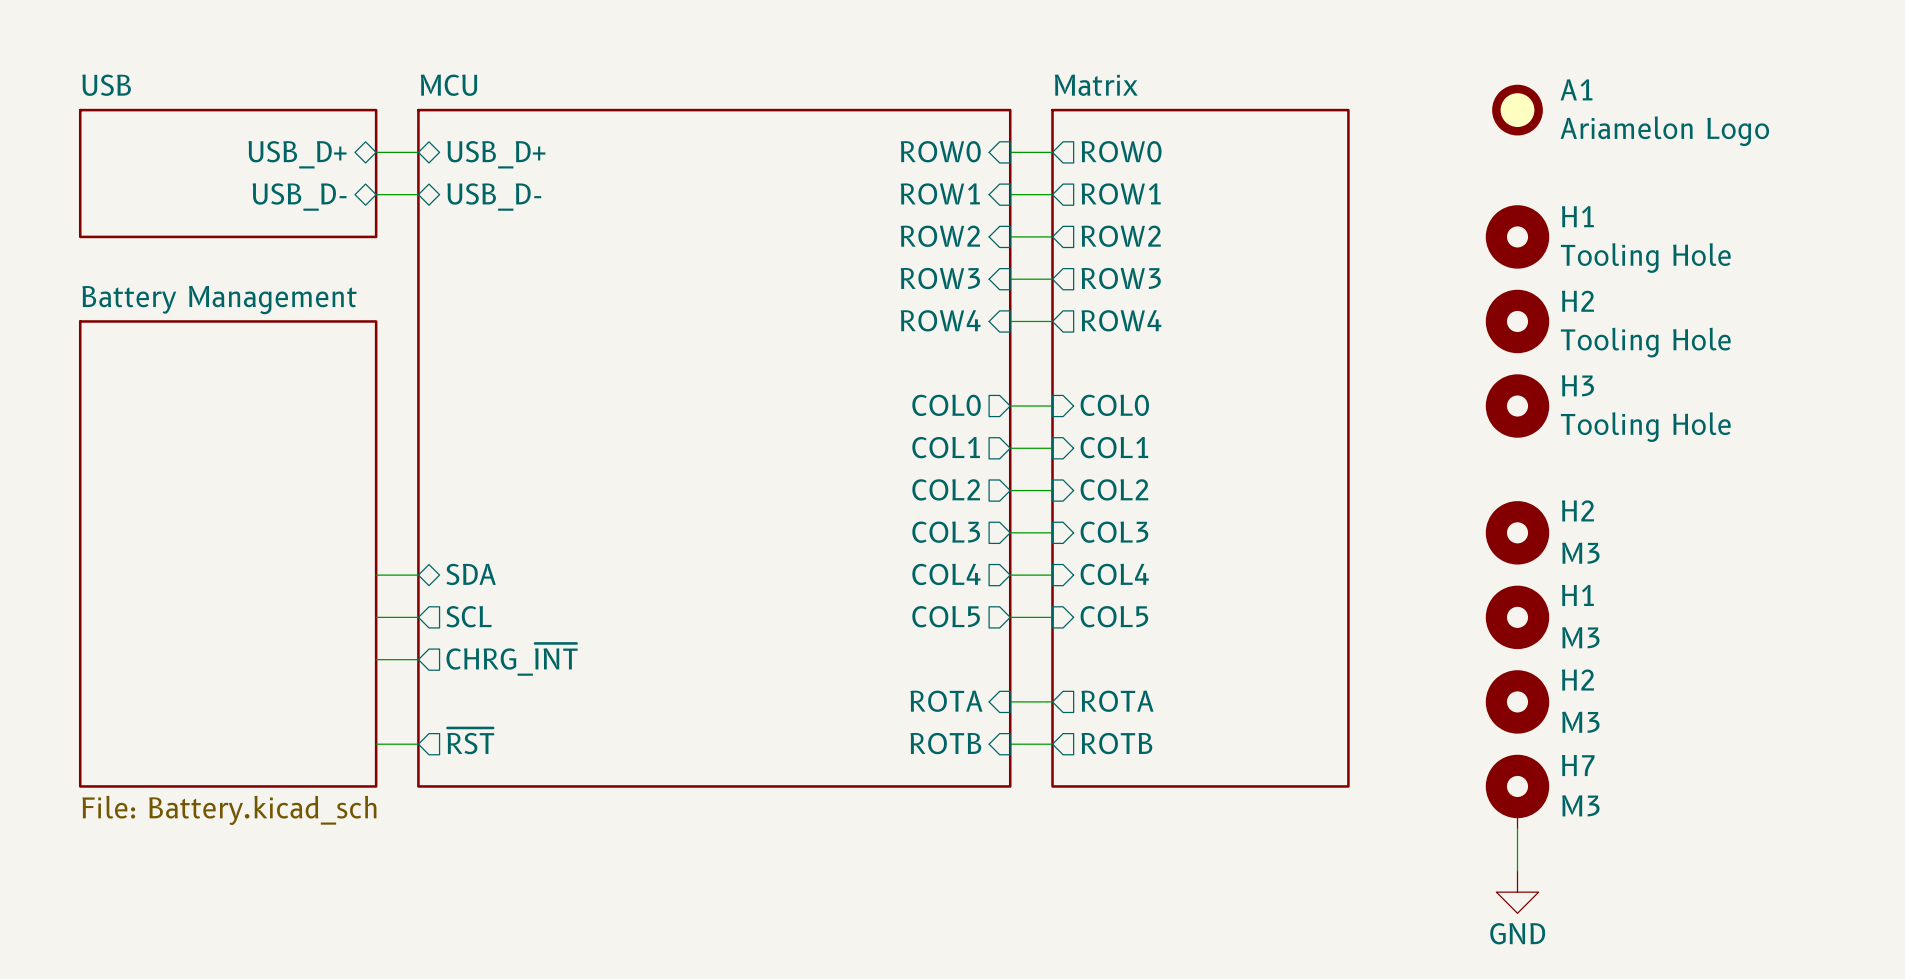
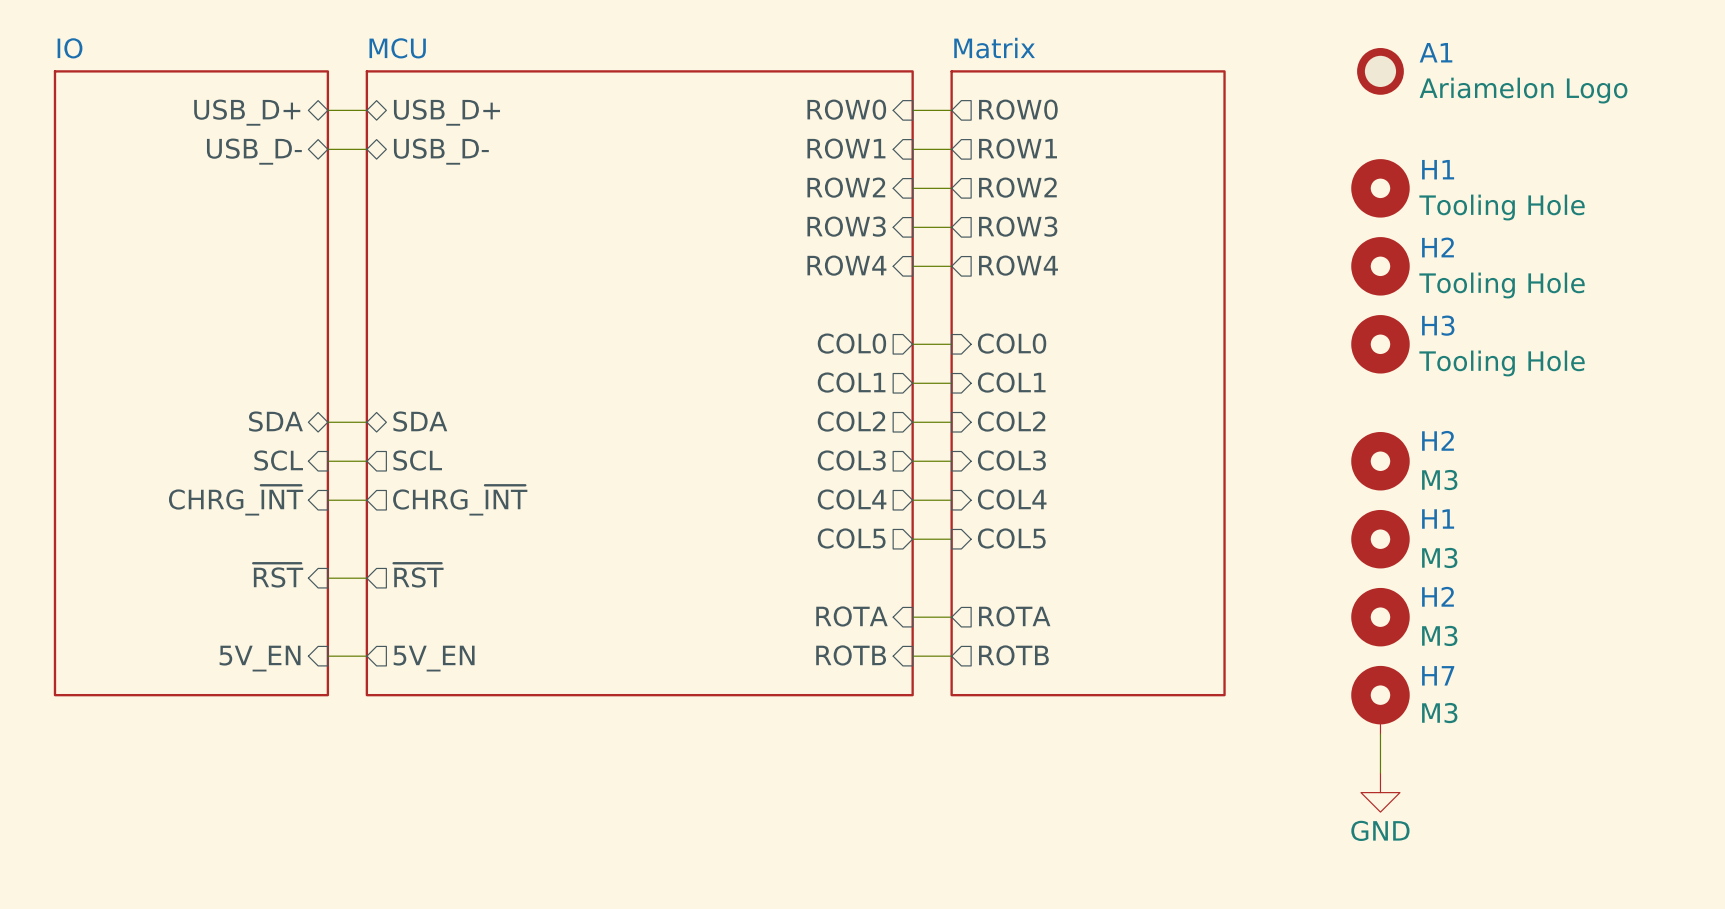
sheet USB: (228, 173) -> none
sheet IO: none -> (191, 383)
sheet pin: none -> SDA (275, 421)
sheet pin: none -> SDA (420, 421)
wire: none -> (327, 422) (366, 422)
sheet pin: none -> SCL (278, 460)
sheet pin: none -> SCL (417, 460)
sheet Battery Management: File: Battery.kicad_sch (228, 553) -> none
sheet pin shape: bidirectional (471, 574) -> output (460, 500)
sheet pin: SDA (471, 574) -> CHRG_~{INT} (460, 500)
sheet pin: none -> CHRG_~{INT} (236, 500)
sheet pin: SCL (469, 616) -> none
wire: (376, 617) (418, 617) -> (327, 461) (366, 461)
sheet pin: none -> ~{RST} (278, 575)
sheet pin: CHRG_~{INT} (512, 659) -> ~{RST} (418, 575)
sheet pin: ~{RST} (470, 741) -> 5V_EN (434, 658)
sheet pin: none -> 5V_EN (260, 658)

